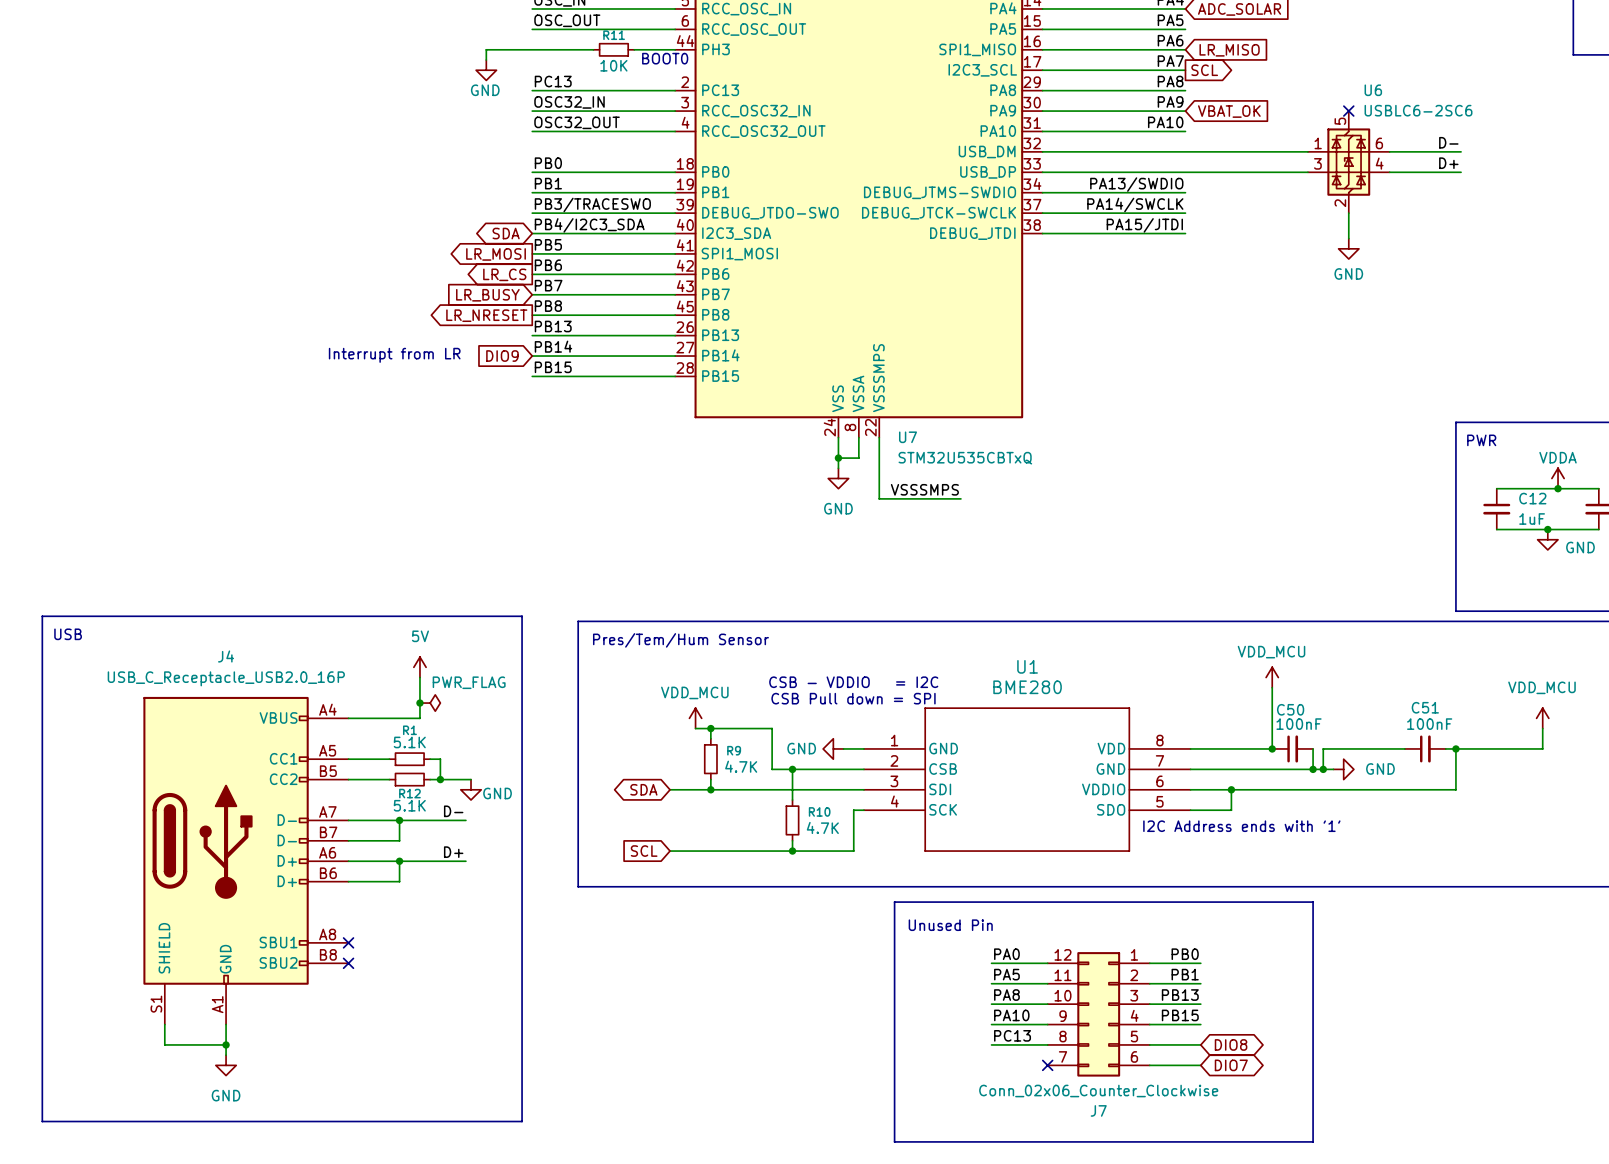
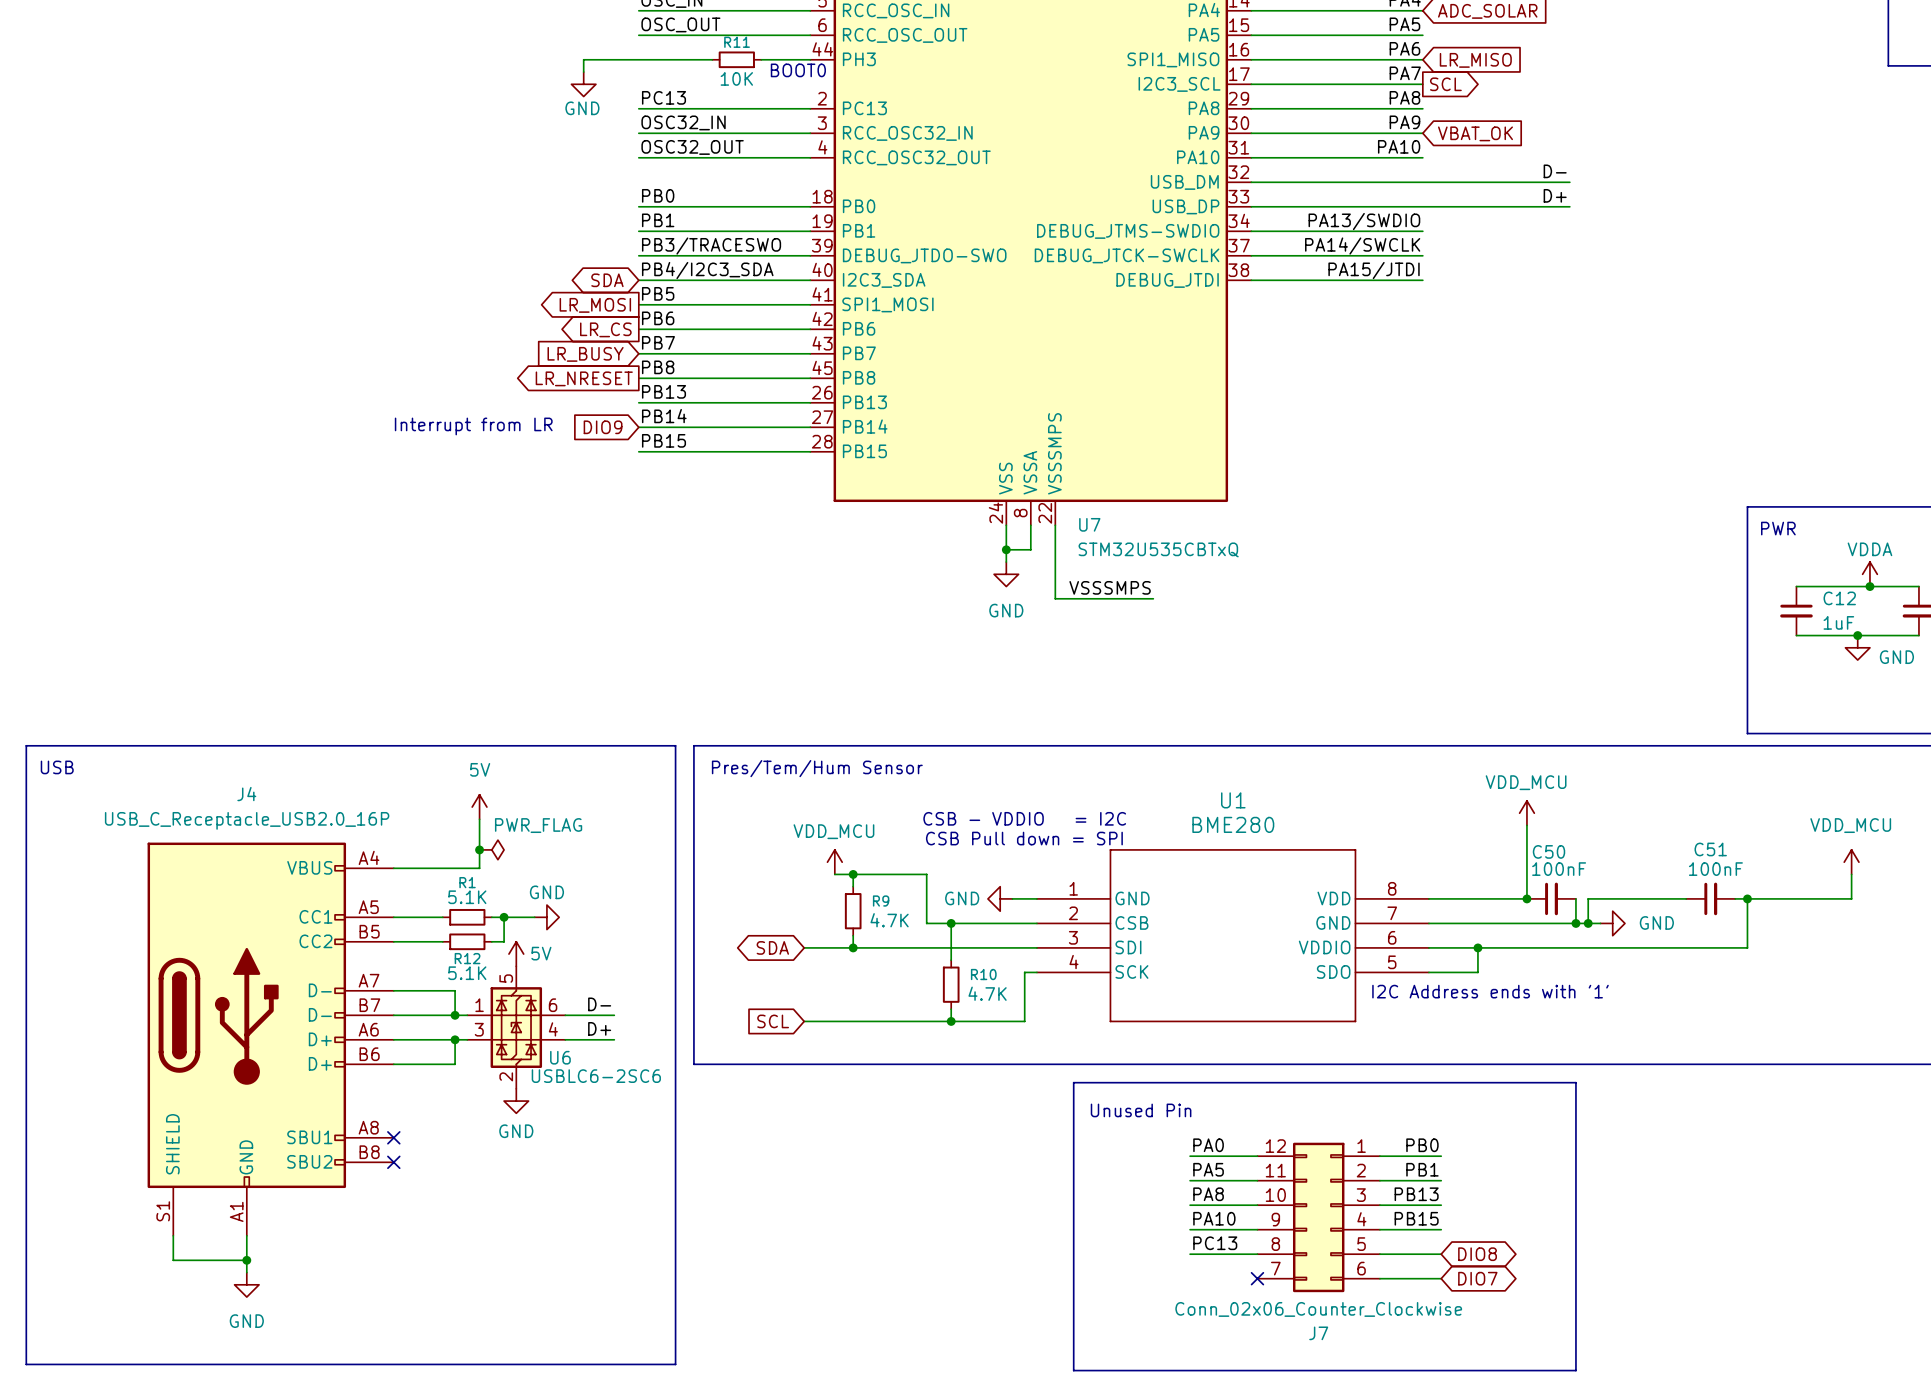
U6 name position: U6 (1373, 90) -> U6 (560, 1057)
U6 value position: USBLC6-2SC6 (1418, 110) -> USBLC6-2SC6 (596, 1076)
no-connect mark: (1348, 111) -> none
label position: D- (1448, 142) -> D- (1555, 171)
wire: (1389, 151) (1461, 151) -> none
U6 position: (1348, 162) -> (516, 1027)
label position: D+ (1448, 163) -> D+ (1555, 195)
wire: (1389, 172) (1461, 172) -> none
wire: (1348, 213) (1348, 238) -> none
power symbol: GND (1348, 248) -> none
line: (42, 616) (522, 616) (522, 1121) (42, 1121) (42, 616) -> (26, 745) (26, 1364) (675, 1364) (675, 745) (26, 745)
text position: USB (68, 634) -> USB (57, 767)
power symbol position: 5V (419, 667) -> 5V (479, 807)
wire: (419, 677) (419, 718) (348, 718) -> (479, 819) (479, 868) (393, 868)
junction position: (419, 703) -> (479, 849)
power symbol position: PWR_FLAG (430, 703) -> PWR_FLAG (491, 849)
wire: (348, 759) (389, 759) -> (393, 917) (442, 917)
R1 position: (409, 759) -> (467, 917)
wire: (430, 759) (440, 759) (440, 779) -> none
wire: none -> (491, 917) (534, 917)
wire: none -> (504, 917) (504, 941) (491, 941)
wire: (348, 779) (389, 779) -> (393, 941) (442, 941)
R12 position: (409, 779) -> (467, 941)
wire: (430, 779) (471, 779) -> (565, 1015) (614, 1015)
junction position: (440, 779) -> (504, 917)
power symbol rotation: 0° (471, 789) -> 90° counterclockwise (546, 917)
power symbol position: GND (471, 789) -> GND (546, 917)
power symbol: none -> 5V (516, 954)
label position: D- (453, 811) -> D- (599, 1004)
wire: (348, 820) (465, 820) -> none
wire: (399, 820) (399, 840) (348, 840) -> none
junction: (399, 820) -> none
wire: none -> (393, 990) (455, 990) (455, 1015)
wire: none -> (393, 1015) (467, 1015)
junction: none -> (455, 1015)
label position: D+ (453, 852) -> D+ (599, 1028)
J4 position: (245, 860) -> (270, 1039)
wire: (348, 861) (465, 861) -> none
wire: (399, 861) (399, 881) (348, 881) -> (455, 1039) (455, 1064) (393, 1064)
junction: (399, 861) -> none
wire: none -> (393, 1039) (467, 1039)
junction: none -> (455, 1039)
wire: none -> (565, 1039) (614, 1039)
power symbol: none -> GND (516, 1101)
no-connect mark: (348, 942) -> none
no-connect mark: none -> (393, 1137)
no-connect mark: (348, 963) -> none
no-connect mark: none -> (393, 1162)
wire: (164, 1024) (164, 1044) (226, 1044) -> (173, 1235) (173, 1260) (246, 1260)
wire: (226, 1024) (226, 1055) -> (246, 1235) (246, 1272)
junction position: (226, 1044) -> (246, 1260)
power symbol position: GND (226, 1065) -> GND (246, 1284)

